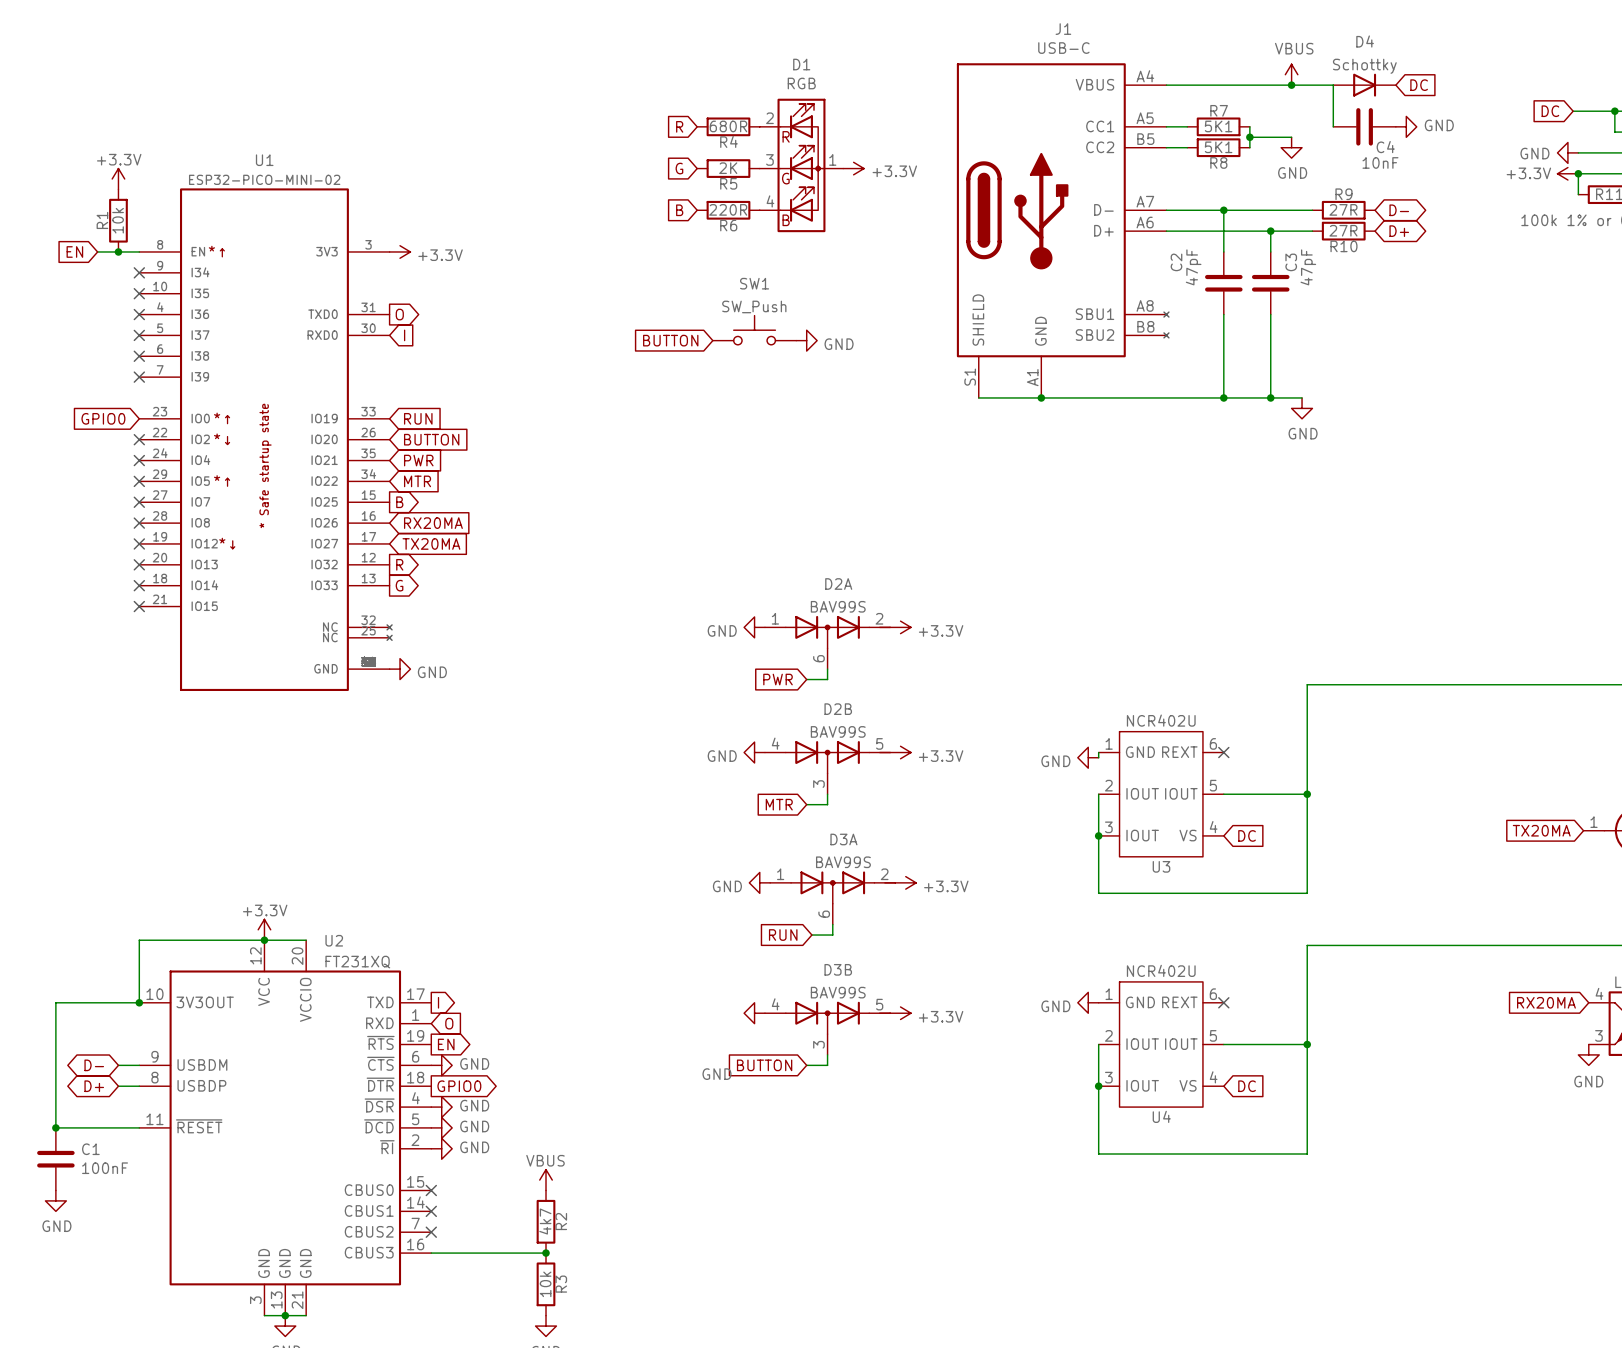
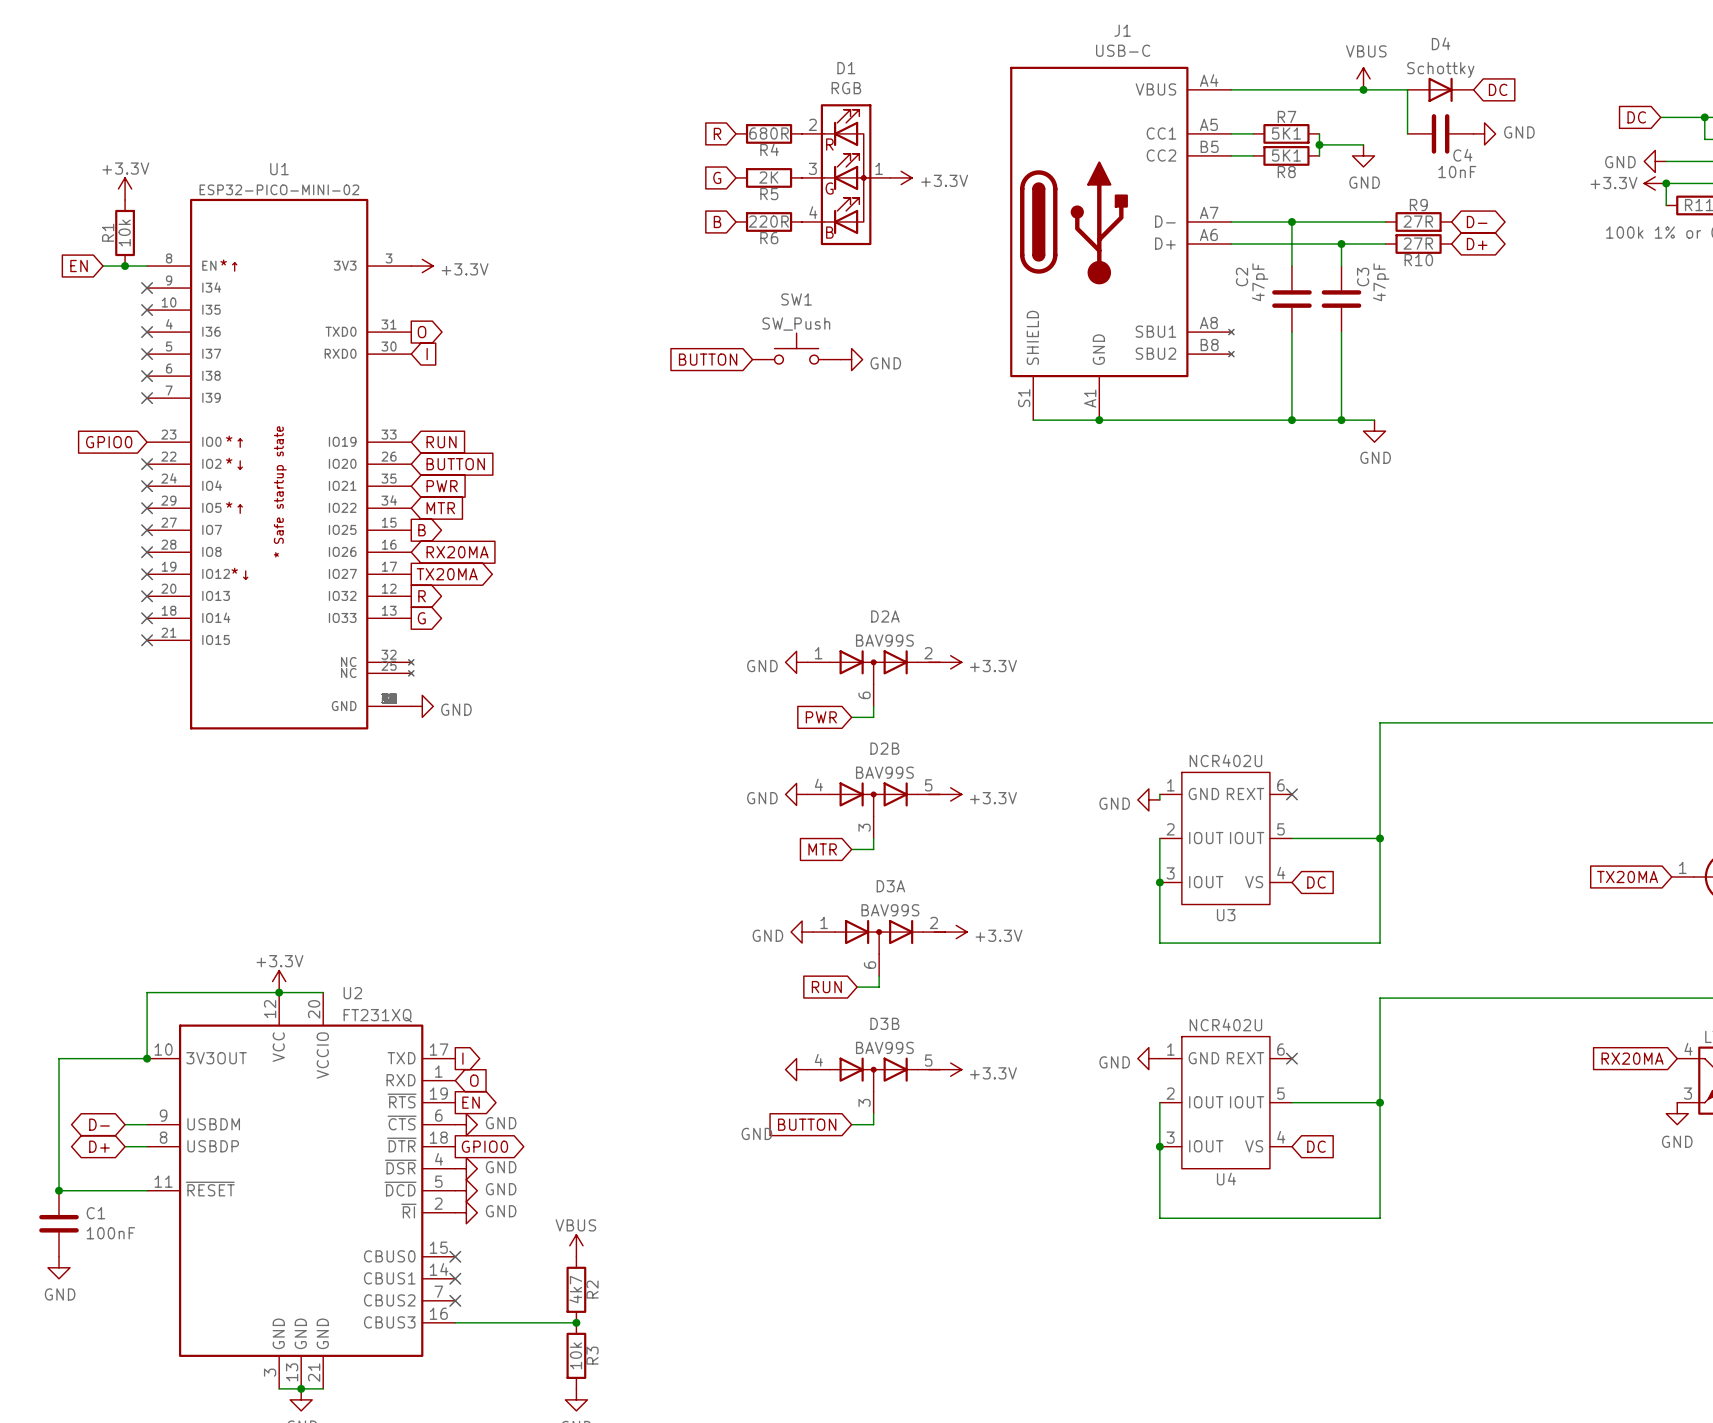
global label shape: input (431, 543) -> output (447, 574)

